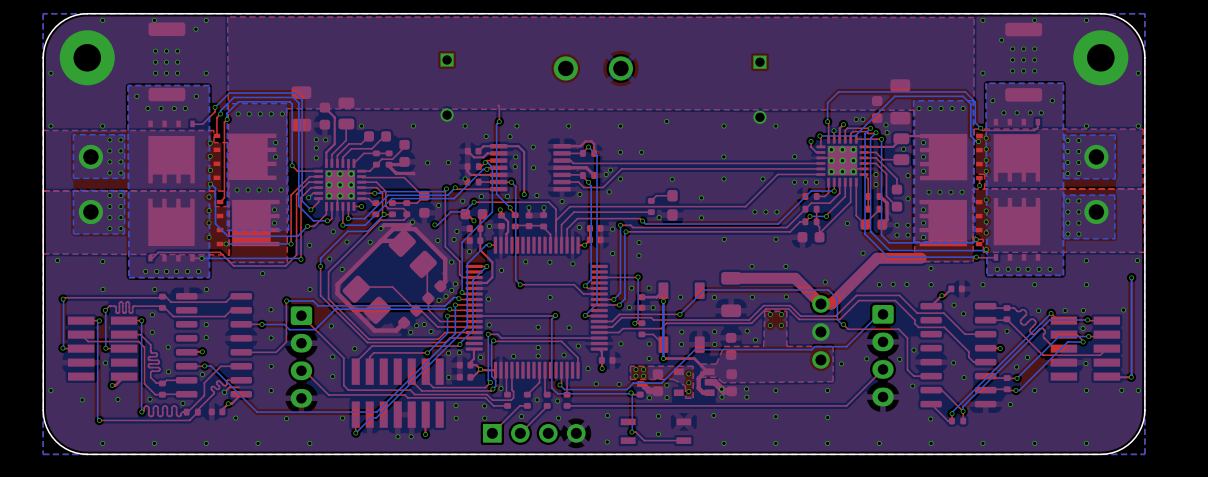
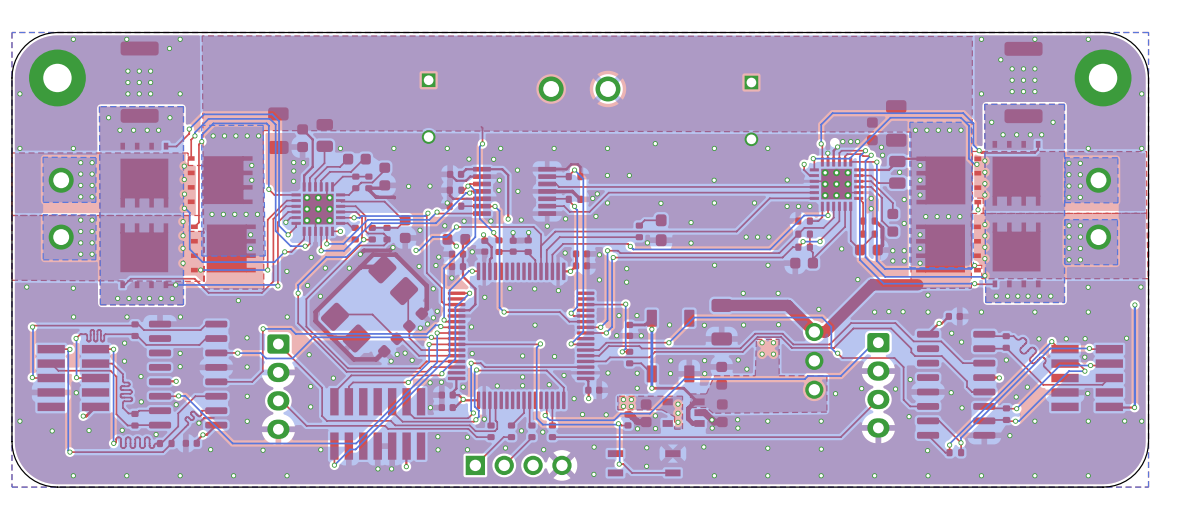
via: none -> (842, 141)

